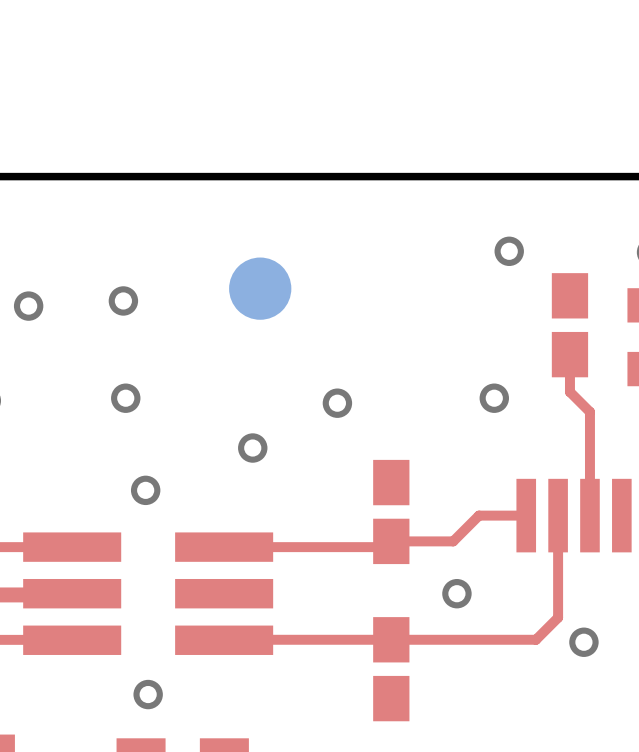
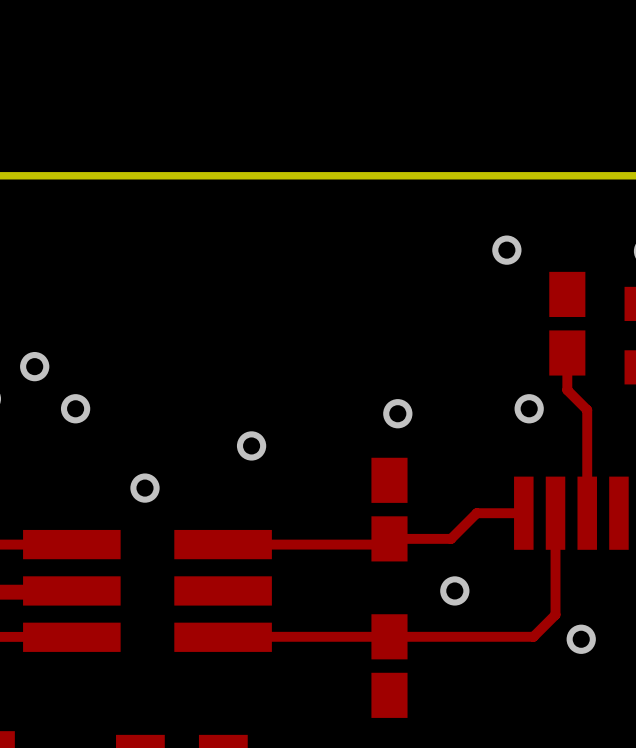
part: (260, 288) -> none
via: (123, 300) -> none
via: (28, 306) -> none
via: none -> (34, 366)
via: (125, 398) -> none
via position: (494, 398) -> (529, 408)
via: (337, 403) -> none
via: none -> (75, 408)
via: none -> (397, 413)
via: (148, 694) -> none

